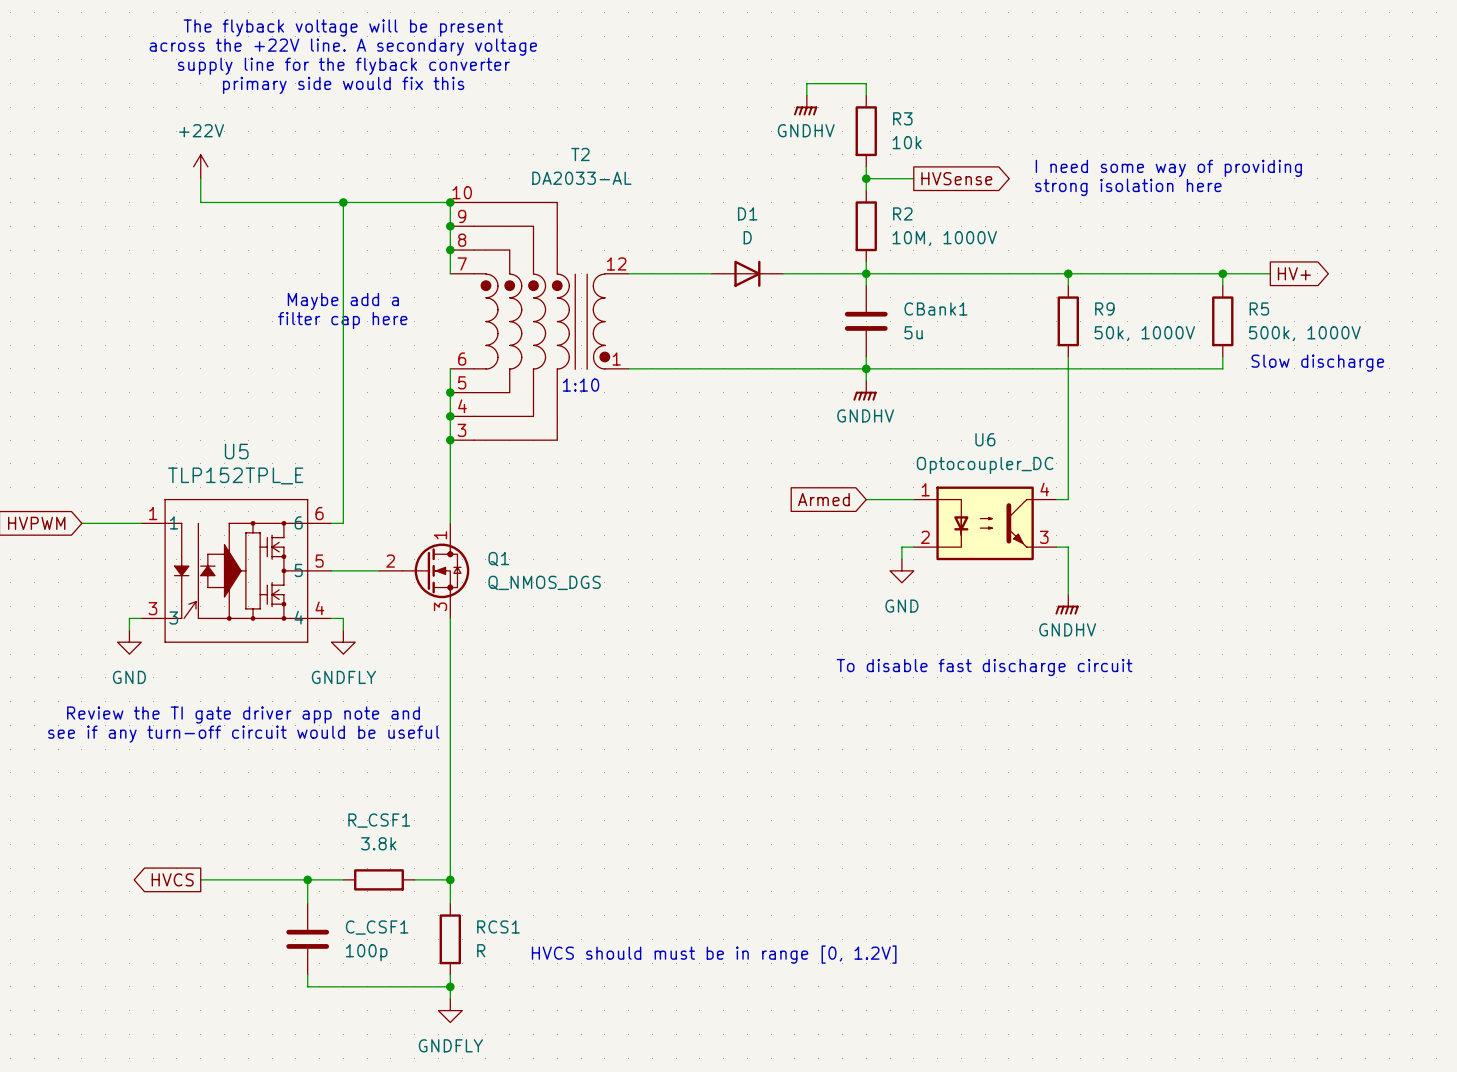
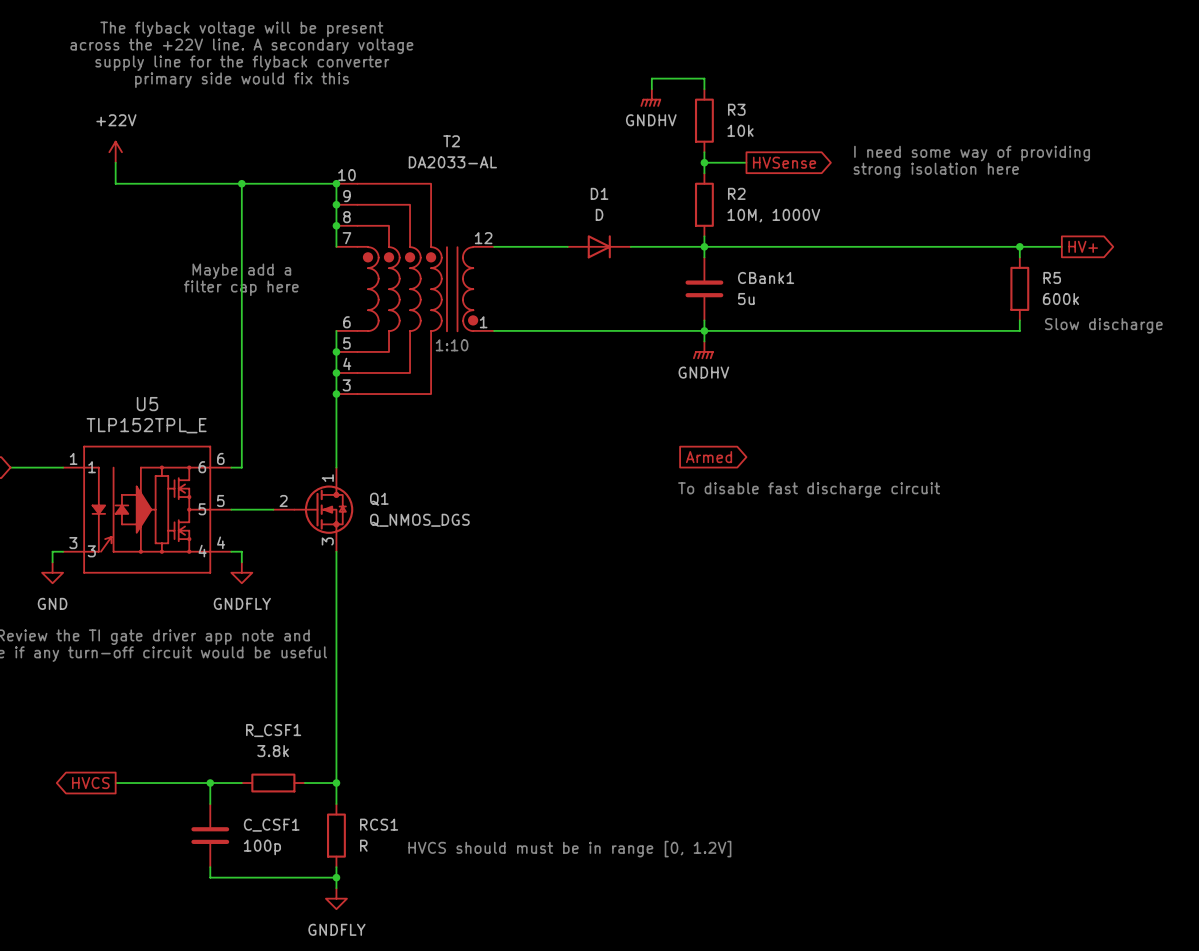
wire: (1068, 273) (1068, 285) -> none
junction: (1068, 273) -> none
R9: 50k, 1000V (1068, 321) -> none
R5 value: 500k, 1000V (1304, 333) -> 600k (1060, 299)
wire: (1068, 356) (1068, 499) (1056, 499) -> none
global label position: Armed (823, 499) -> Armed (709, 457)
U6: Optocoupler_DC (985, 523) -> none
wire: (913, 547) (901, 547) (901, 559) -> none
wire: (1056, 547) (1068, 547) (1068, 594) -> none
power symbol: GND (901, 570) -> none
power symbol: GNDHV (1067, 604) -> none
text position: To disable fast discharge circuit (984, 667) -> To disable fast discharge circuit (809, 490)

